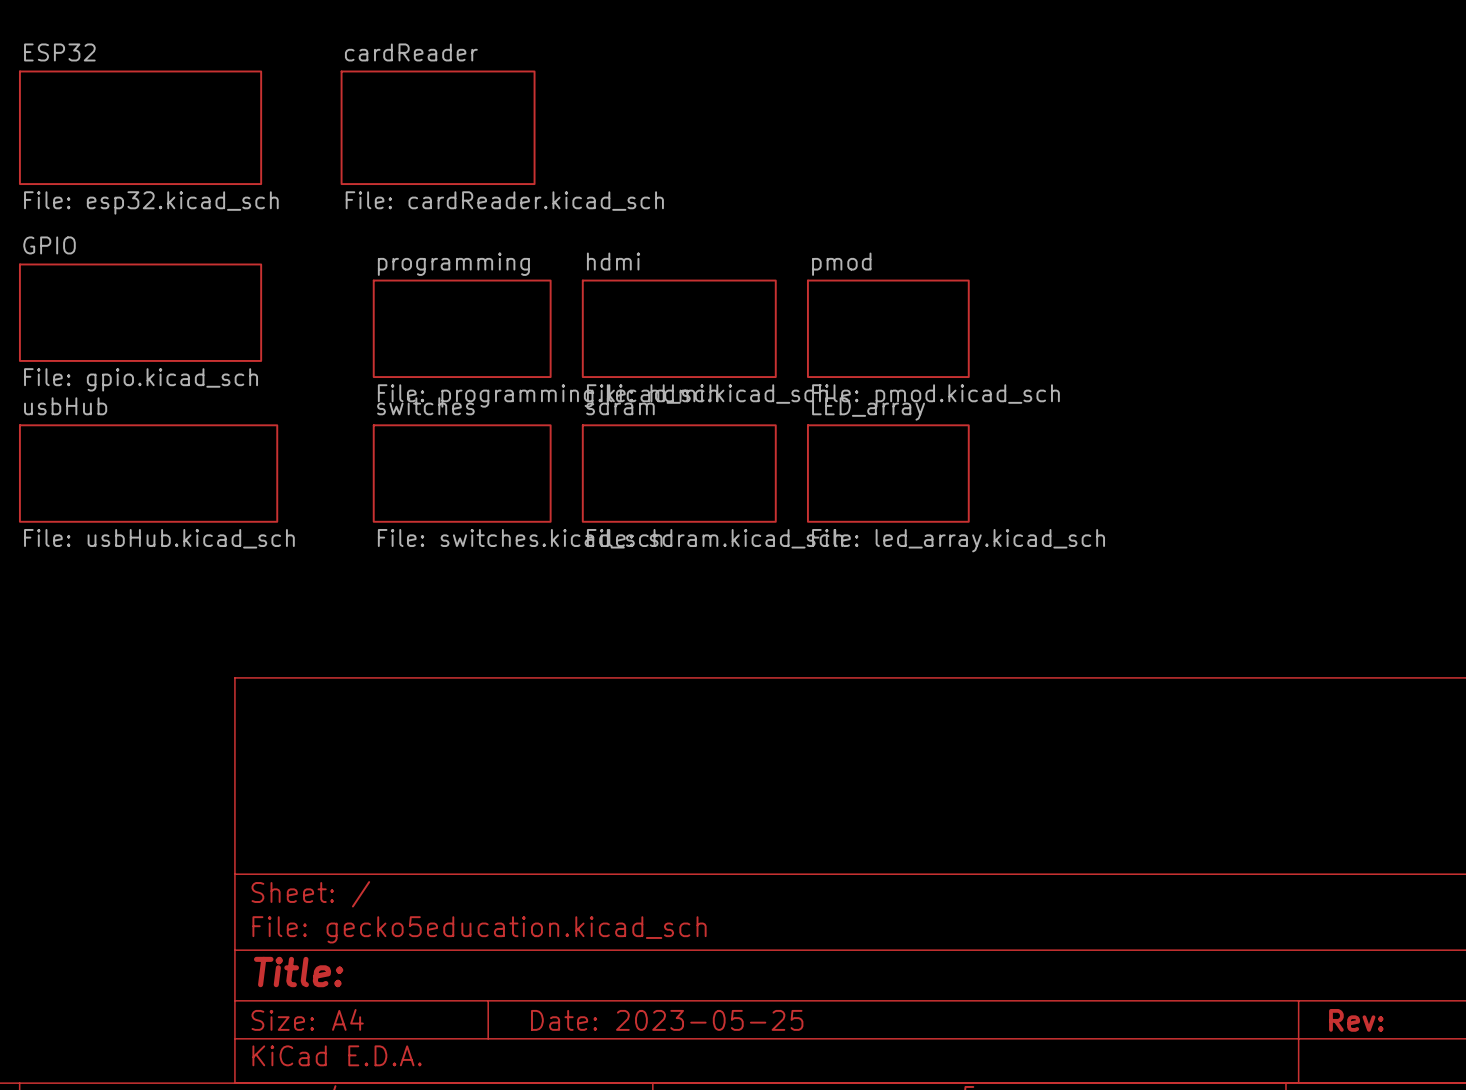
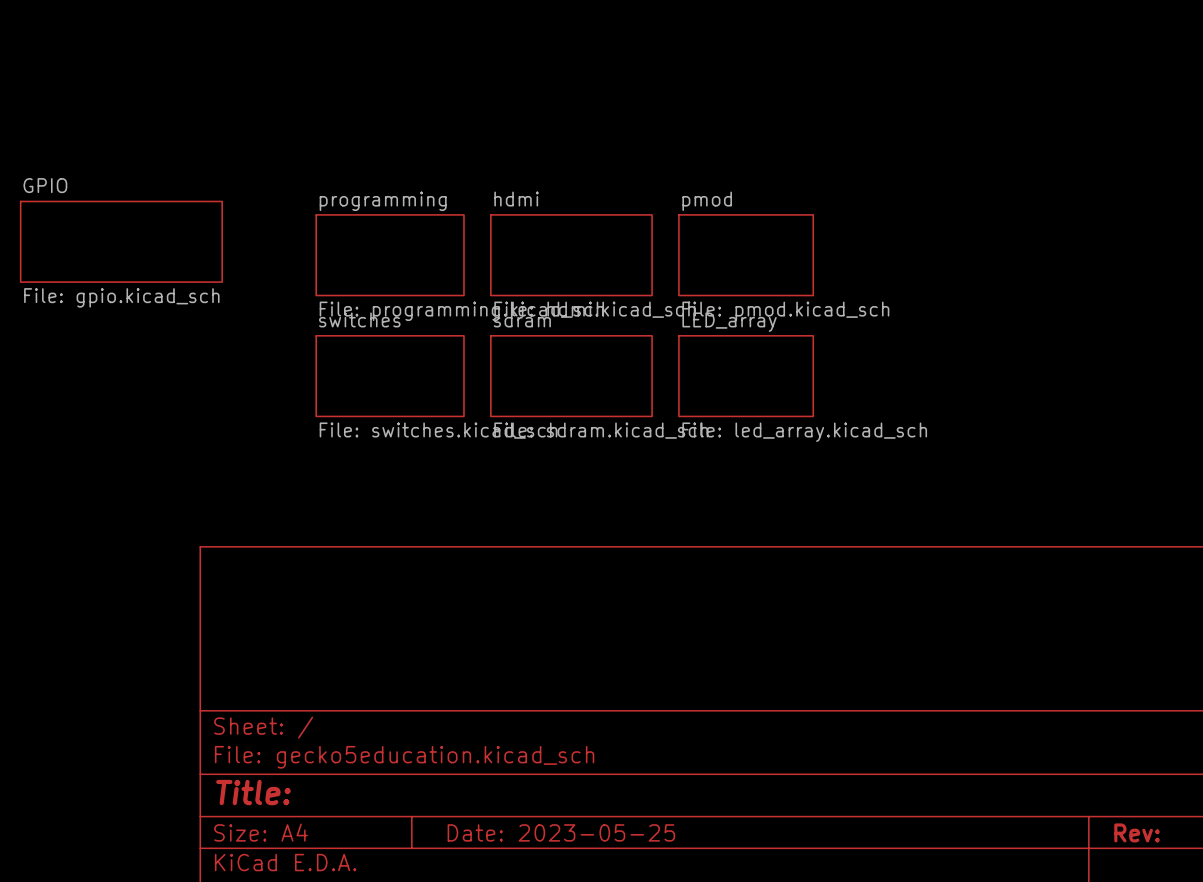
sheet ESP32: File: esp32.kicad_sch (140, 127) -> none
sheet cardReader: File: cardReader.kicad_sch (438, 127) -> none
sheet usbHub: File: usbHub.kicad_sch (148, 473) -> none

